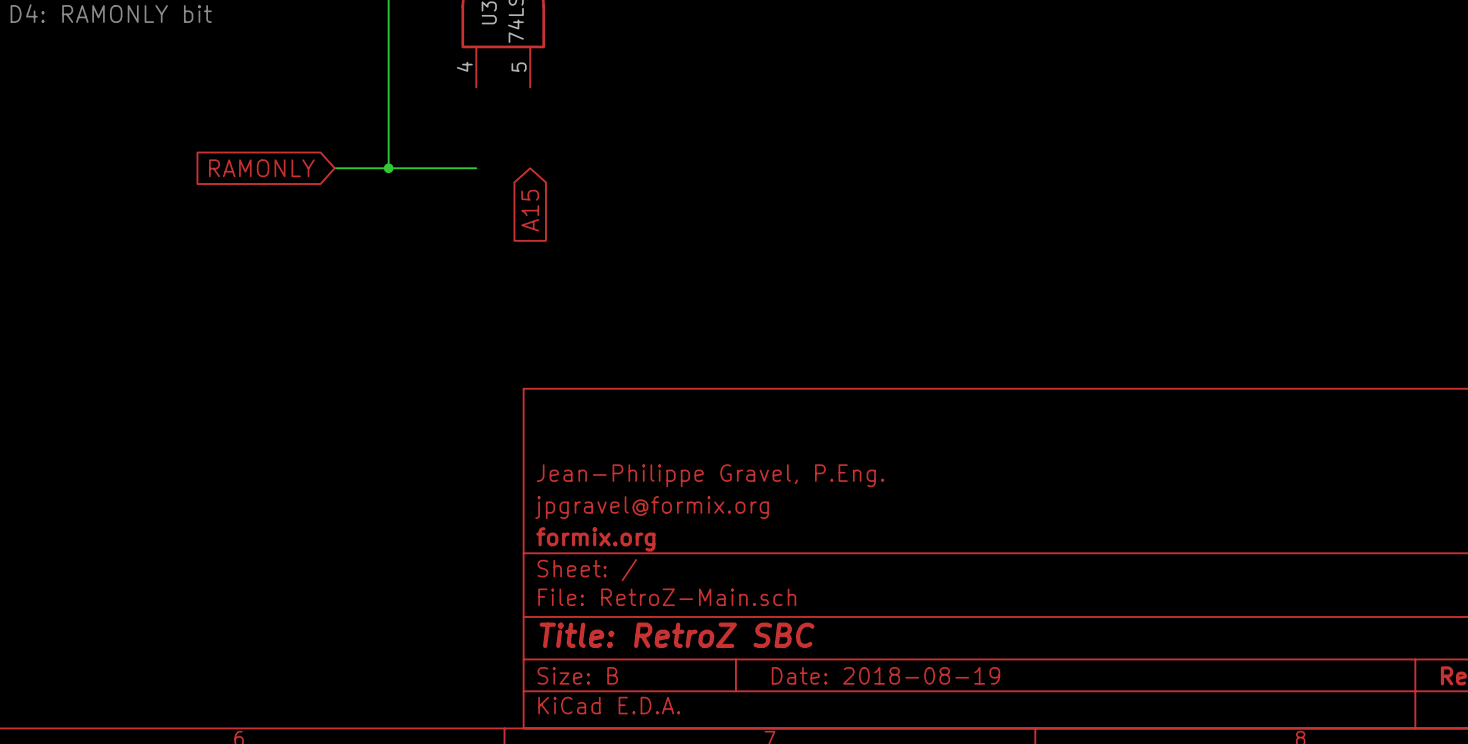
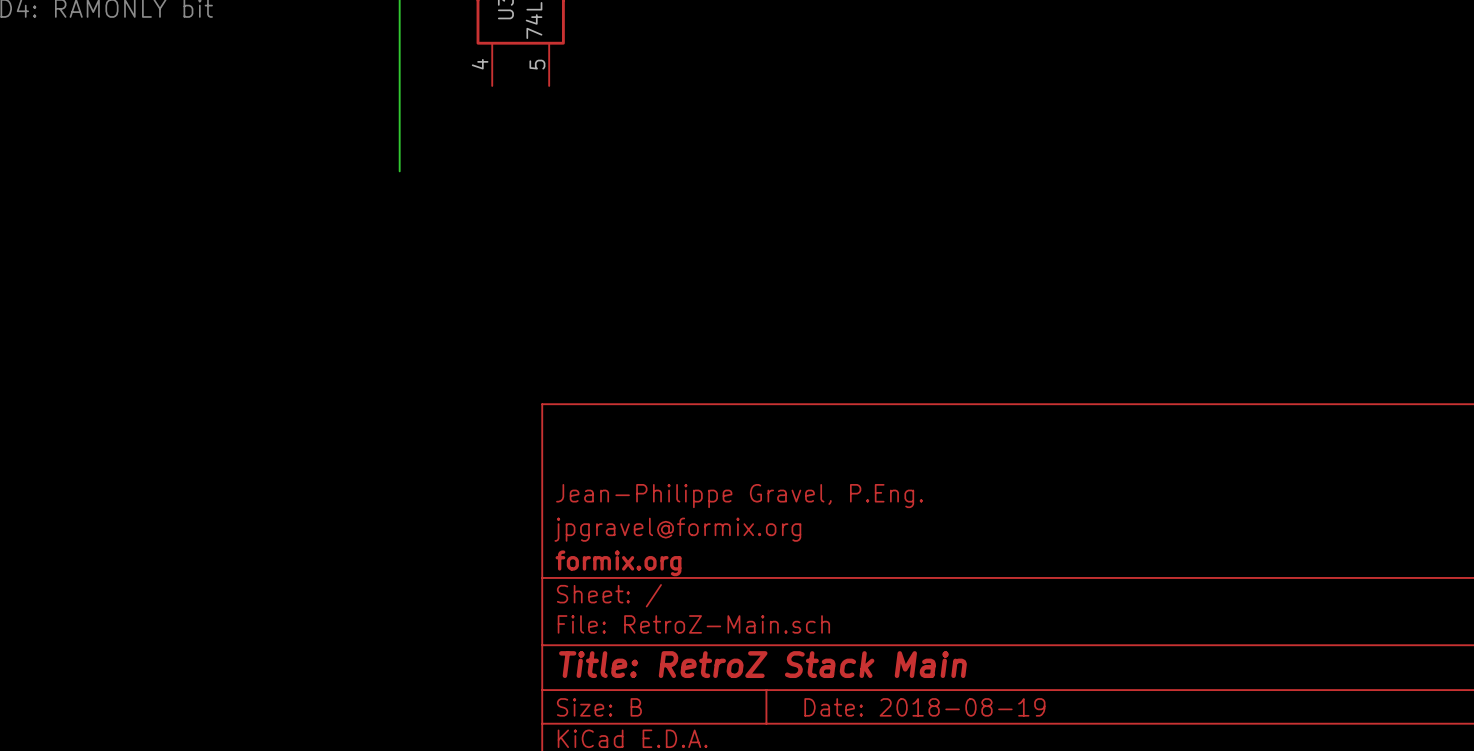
global label: RAMONLY (261, 168) -> none
wire: (334, 168) (476, 168) -> none
junction: (388, 168) -> none
global label: A15 (530, 210) -> none
title block: Title: RetroZ SBC (677, 635) -> Title: RetroZ Stack Main (762, 664)

